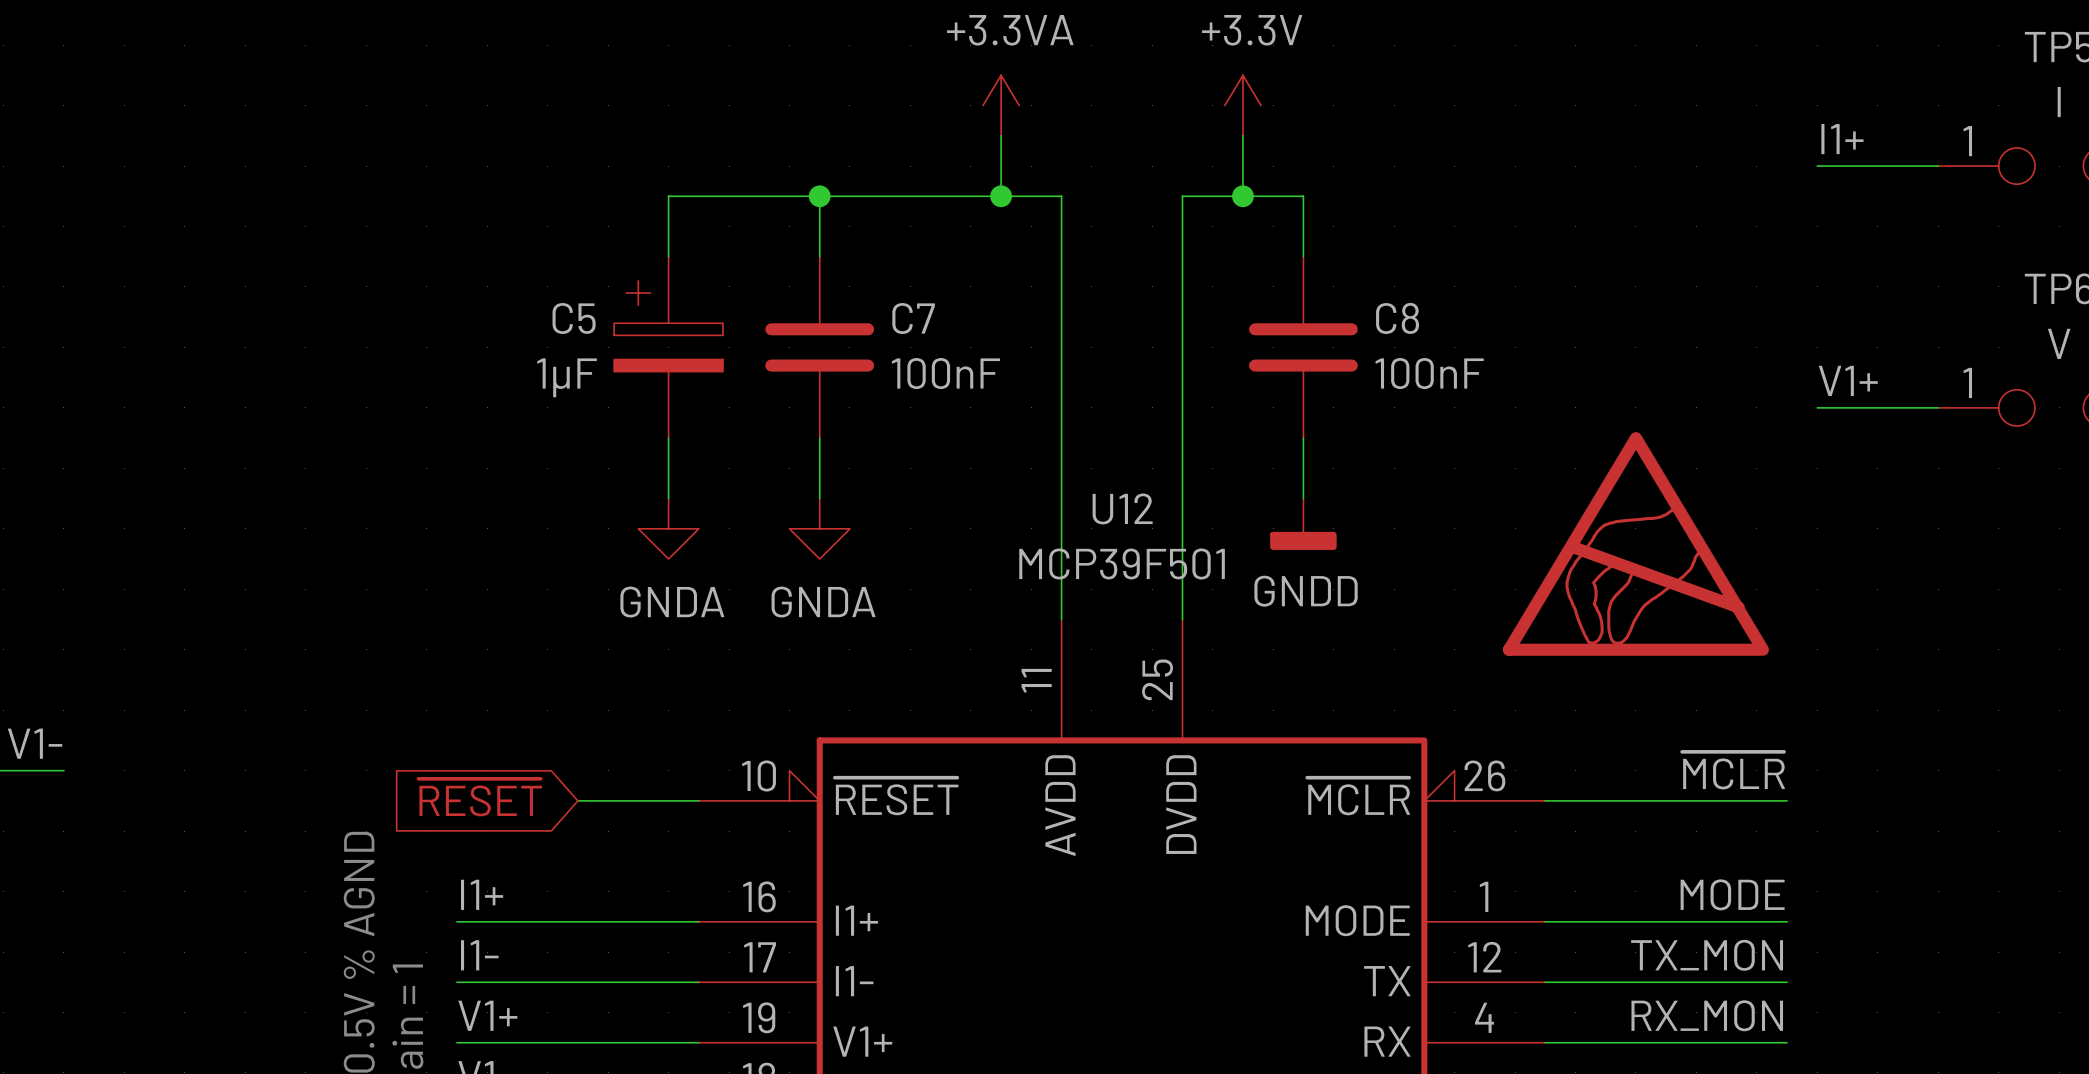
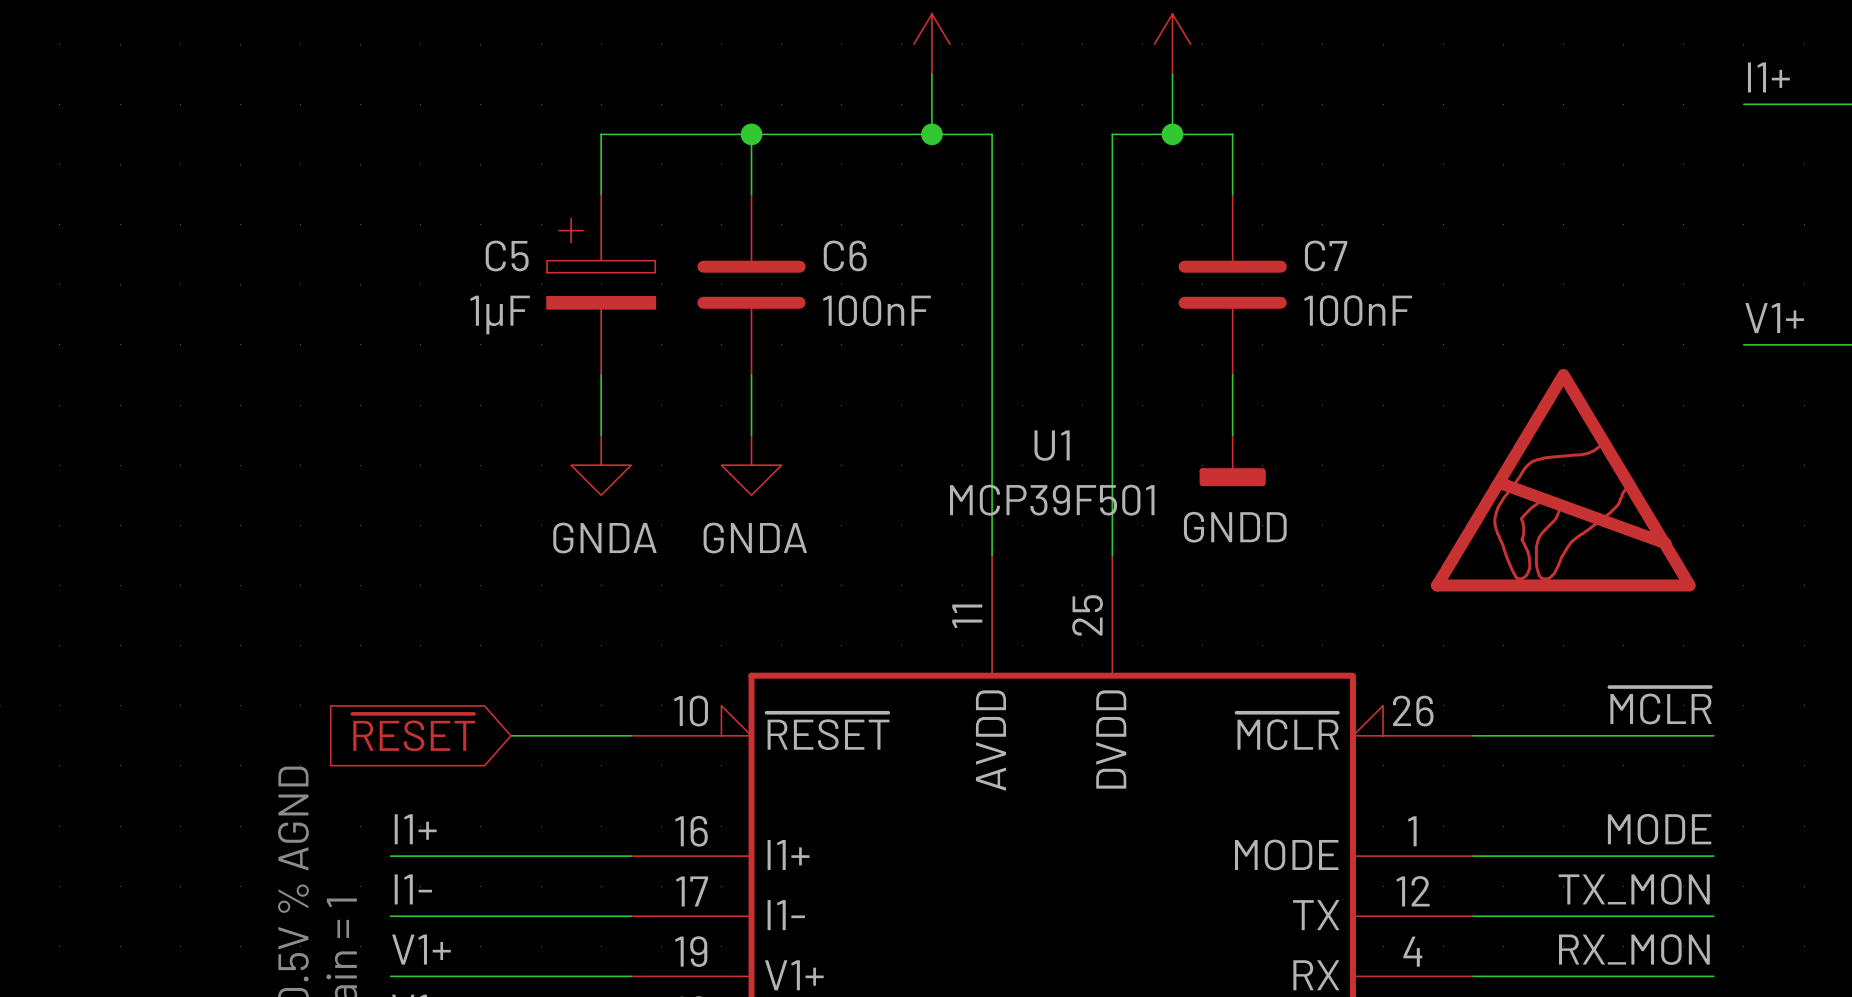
C7 name: C7 (913, 318) -> C6 (845, 255)
C8 name: C8 (1397, 318) -> C7 (1326, 255)
U12 name: U12 (1122, 508) -> U1 (1052, 445)

